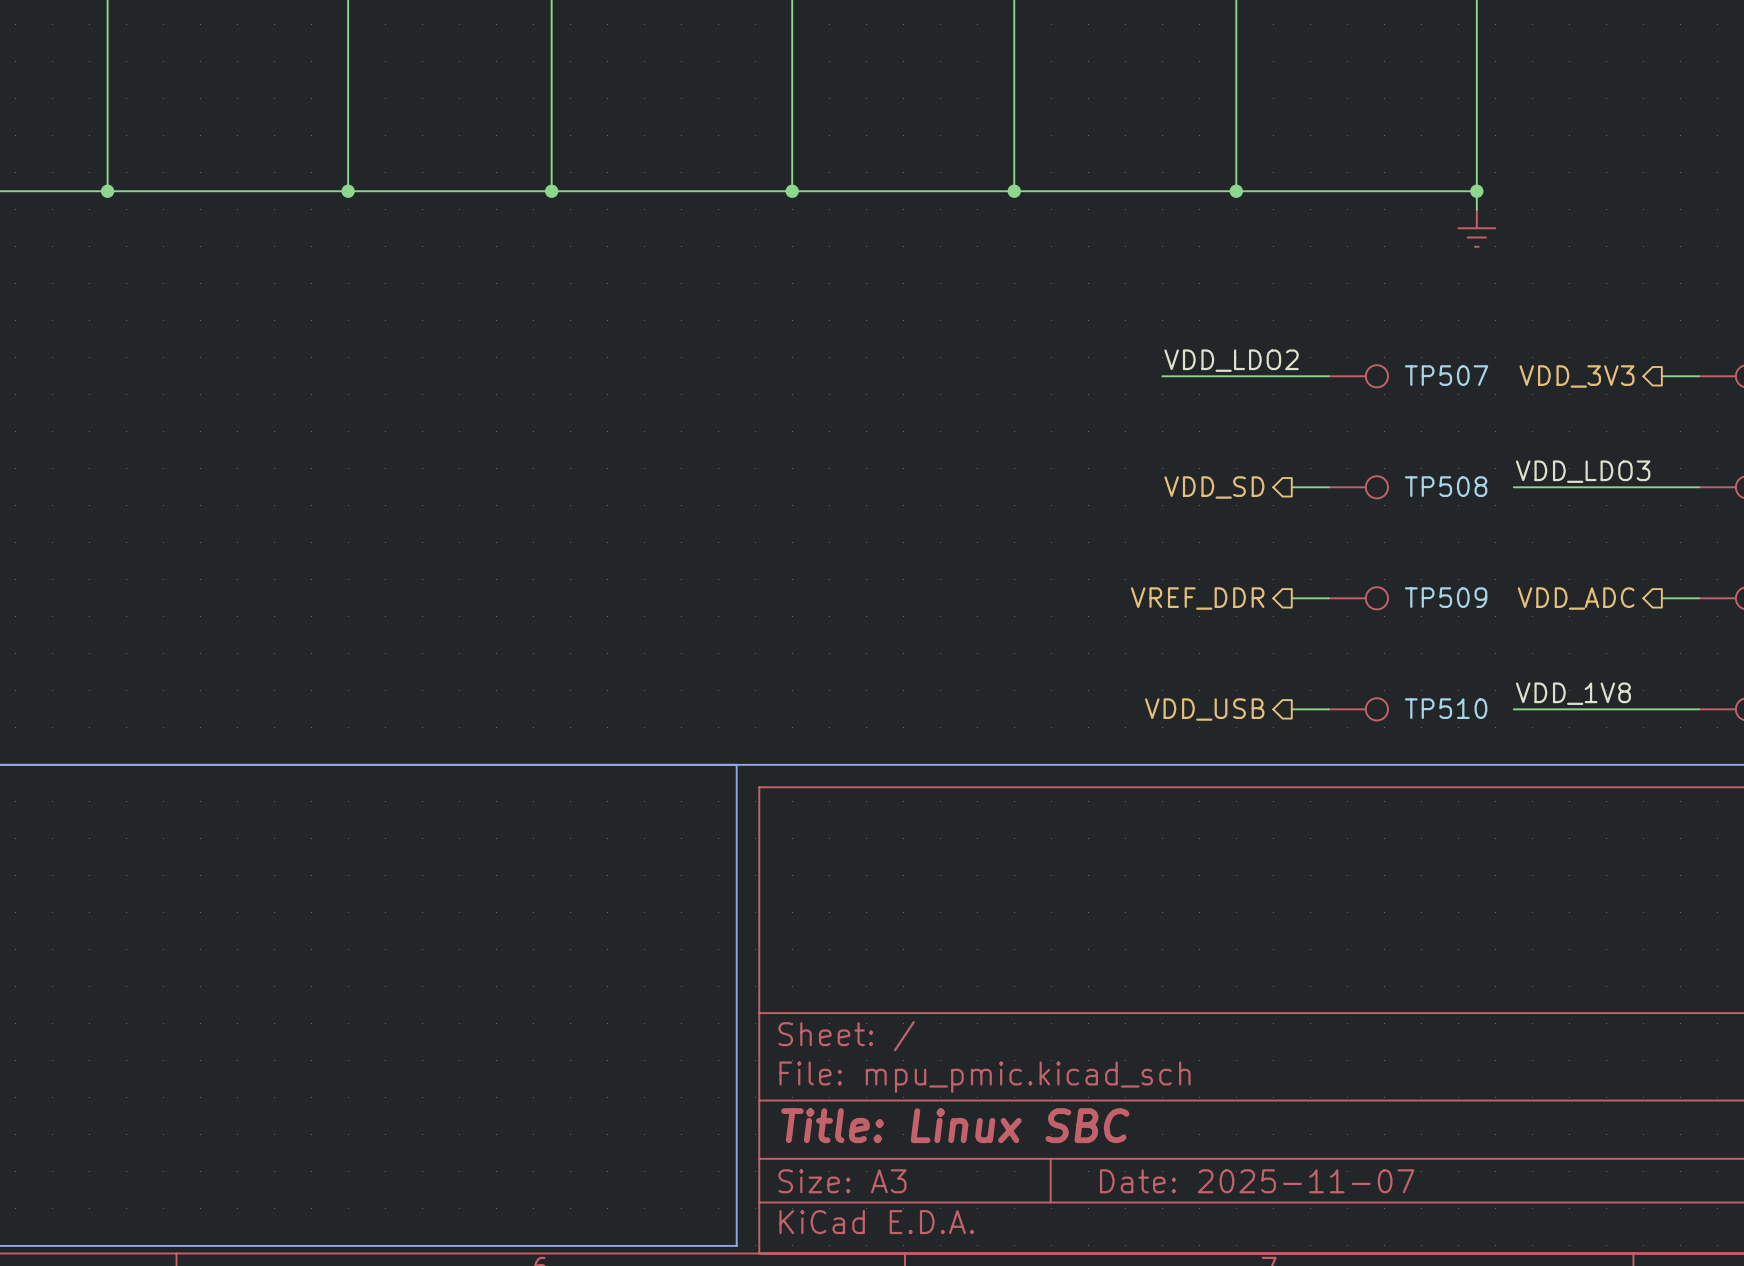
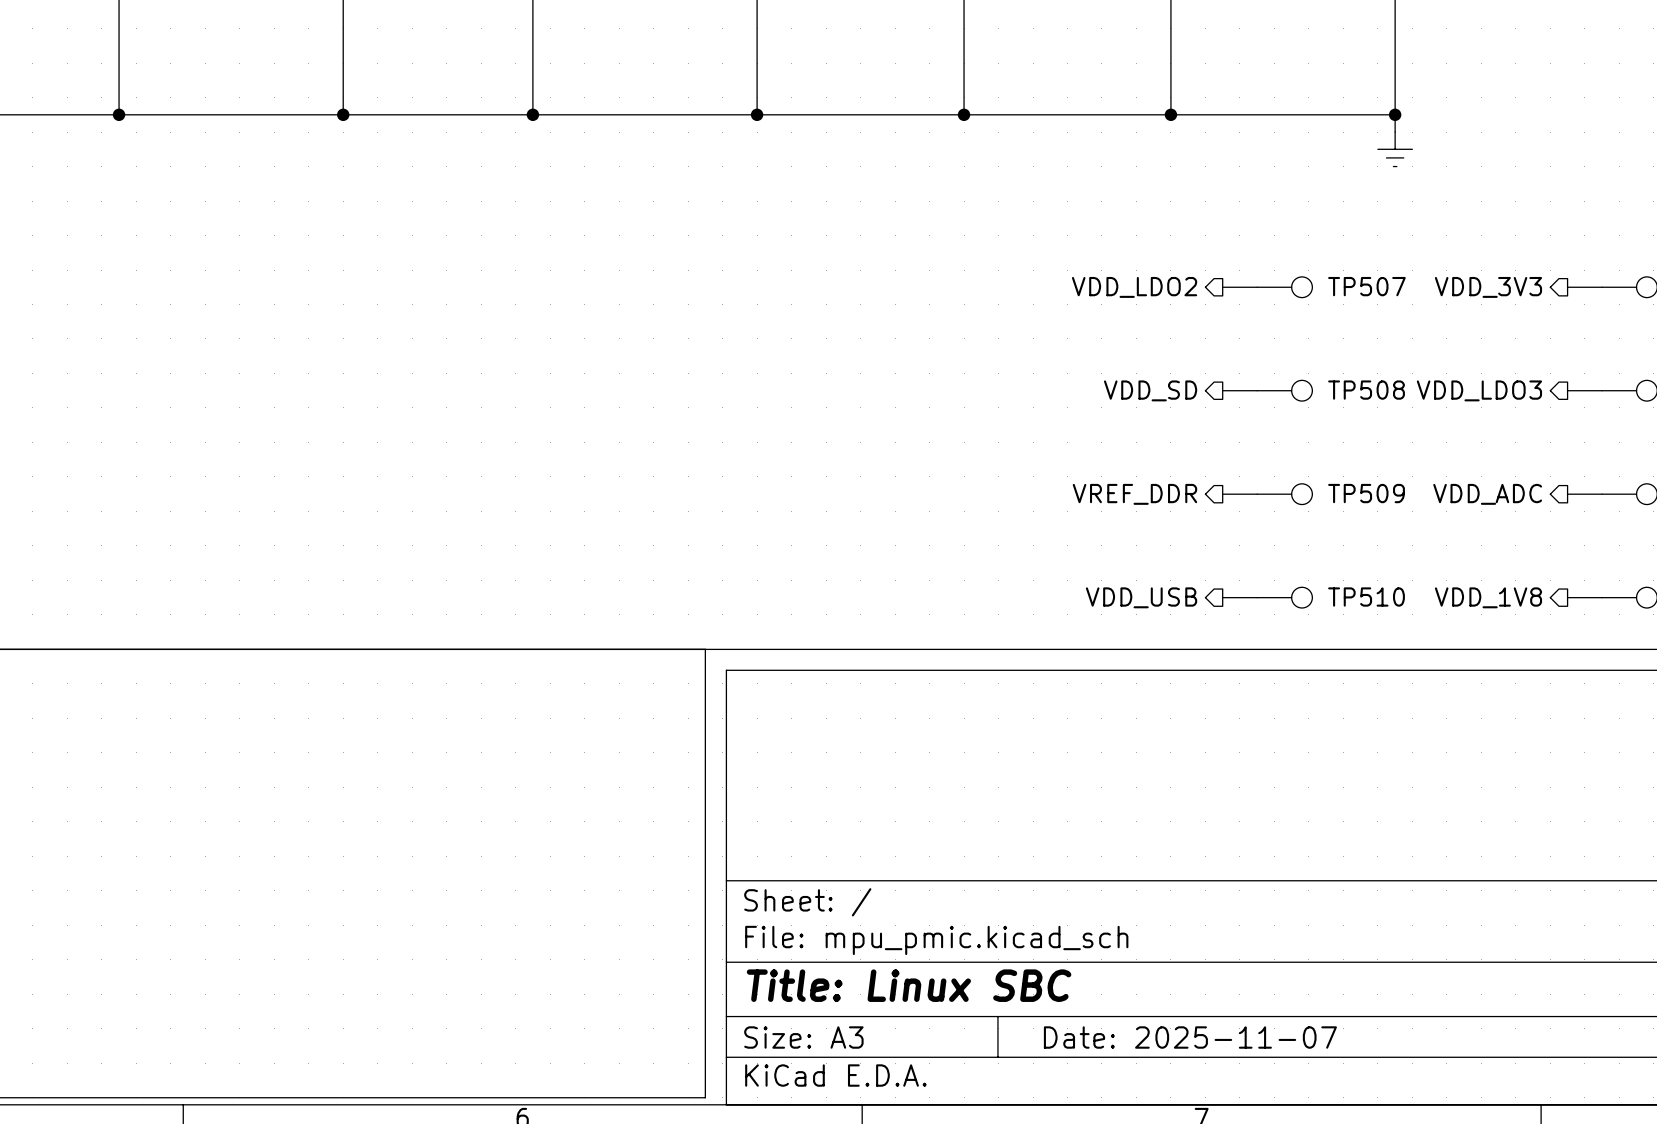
label: VDD_LDO2 (1231, 360) -> none
wire: (1162, 376) (1291, 376) -> none
hierarchical label: none -> VDD_LDO2 (1134, 287)
label: VDD_LDO3 (1583, 471) -> none
wire: (1513, 487) (1661, 487) -> none
hierarchical label: none -> VDD_LDO3 (1479, 390)
label: VDD_1V8 (1573, 693) -> none
wire: (1513, 709) (1661, 709) -> none
hierarchical label: none -> VDD_1V8 (1488, 597)

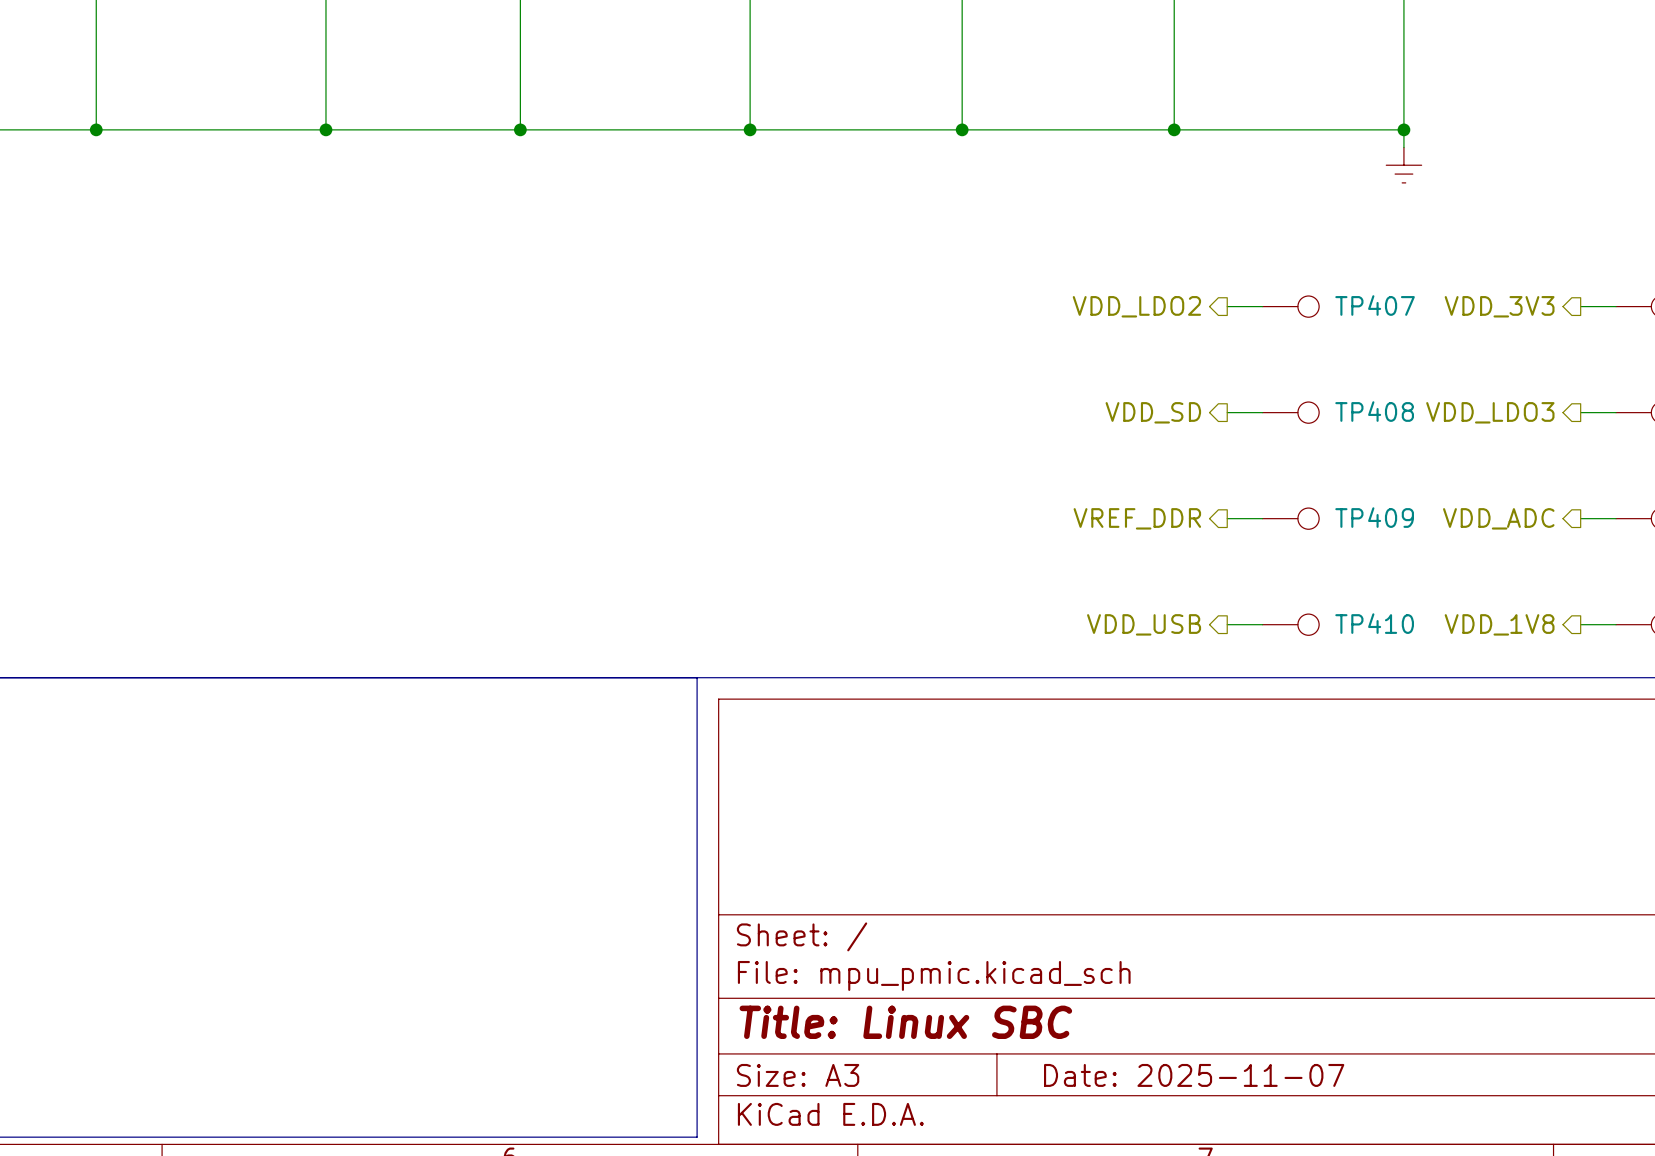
TP507 name: TP507 (1366, 286) -> TP407 (1375, 305)
TP508 name: TP508 (1366, 390) -> TP408 (1374, 411)
TP509 name: TP509 (1366, 493) -> TP409 (1374, 517)
TP510 name: TP510 (1366, 597) -> TP410 (1374, 623)

